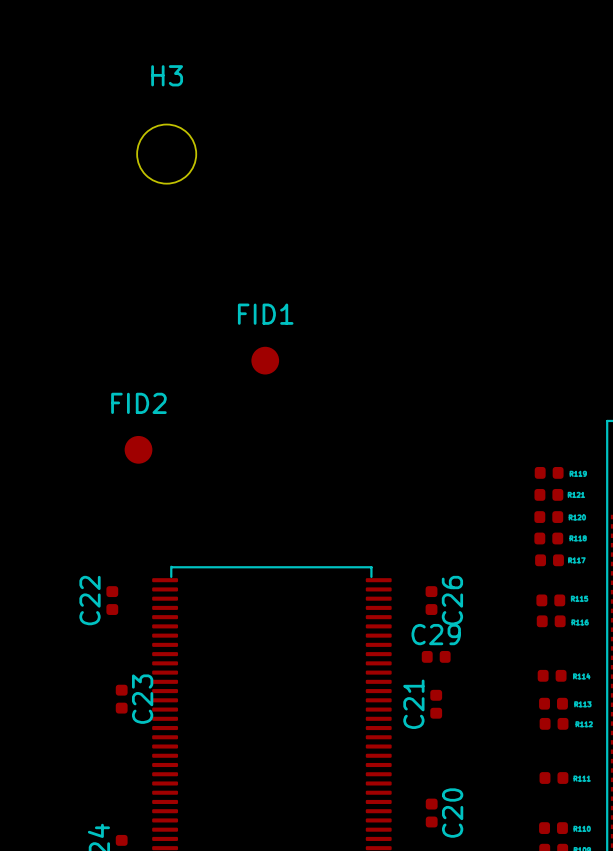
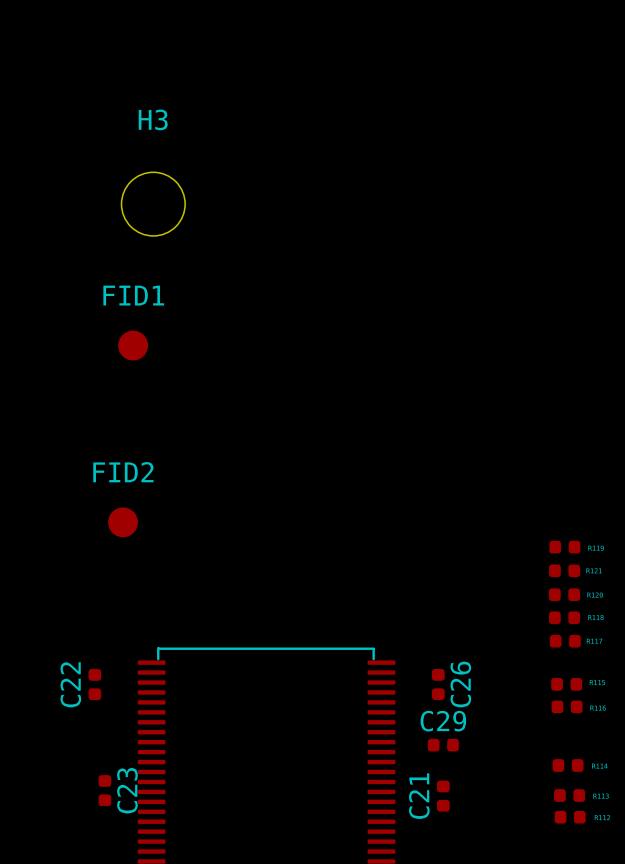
FID1 position: (265, 360) -> (133, 345)

